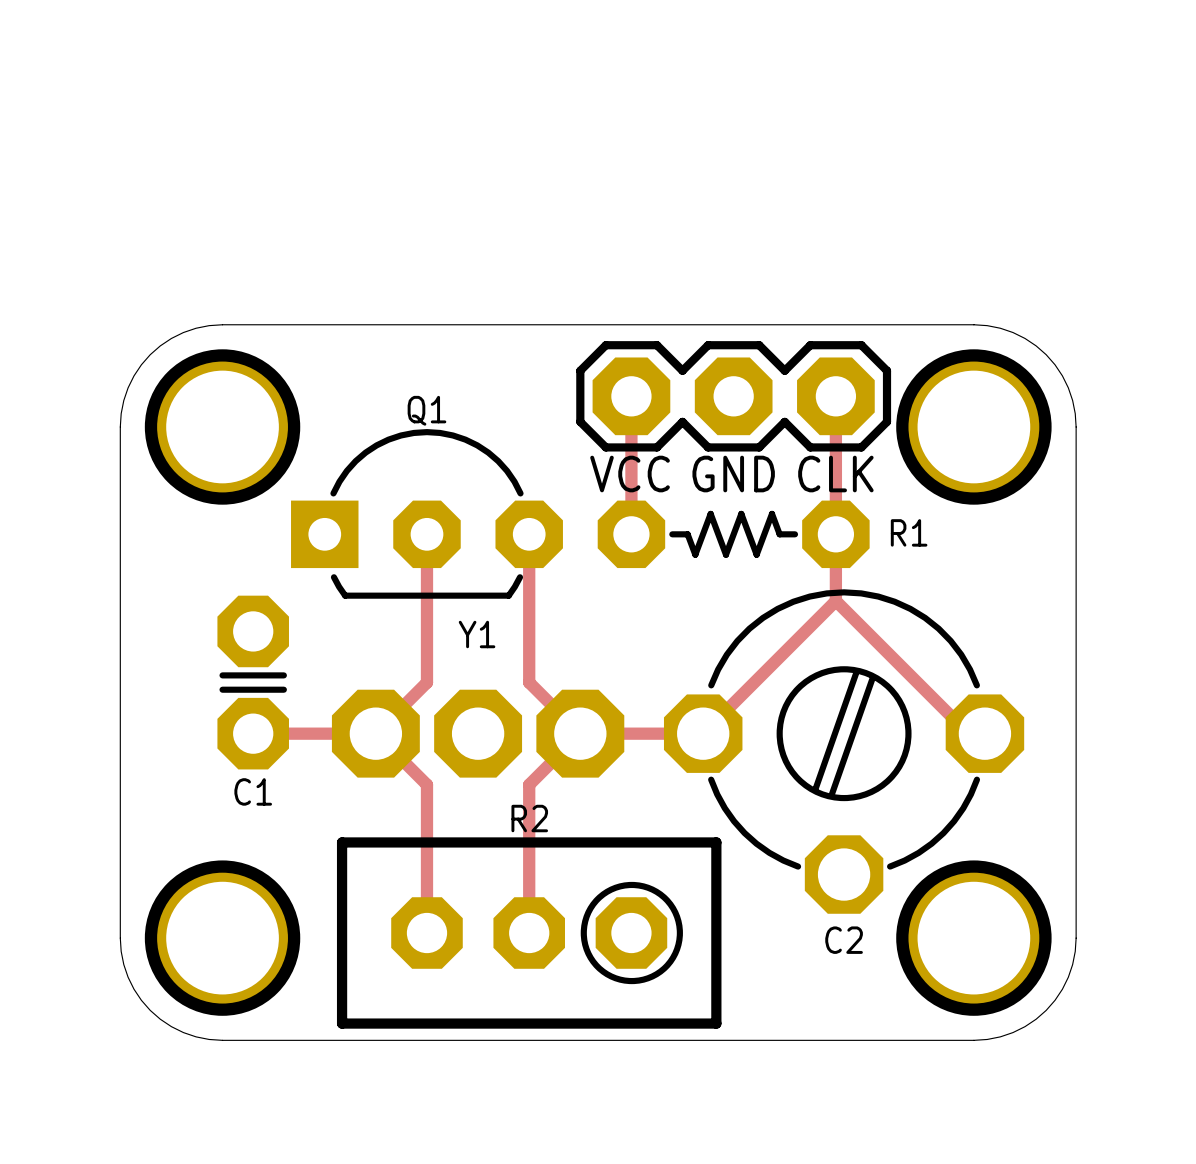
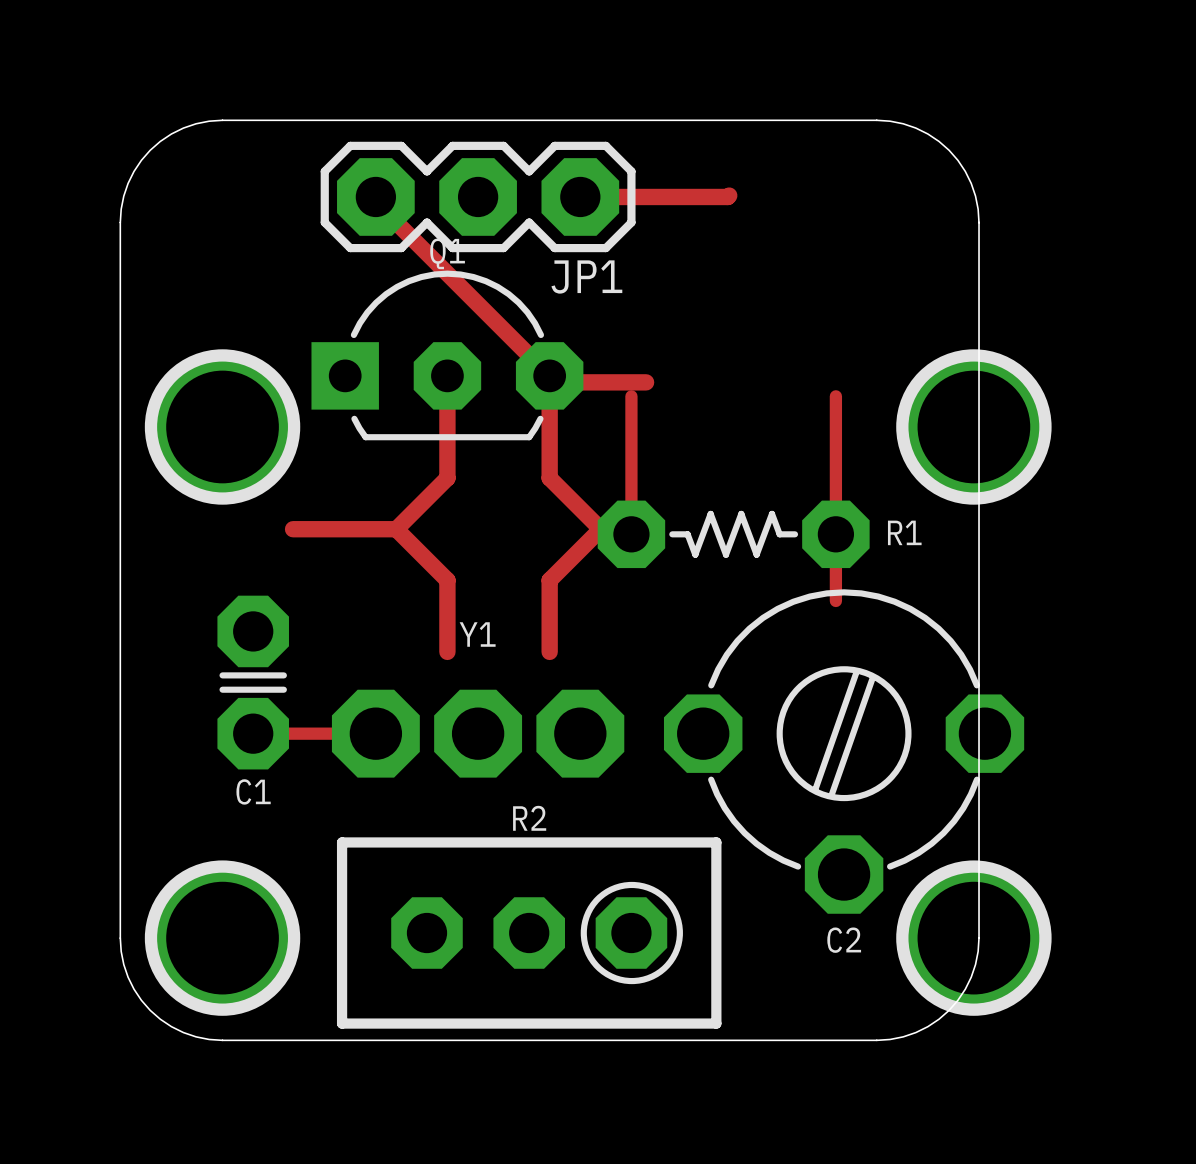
track: none -> (729, 195) (580, 196)
track: none -> (375, 196) (375, 202) (549, 375) (549, 478) (600, 529) (549, 580) (549, 651)
JP1: none -> (478, 196)
track: none -> (447, 375) (447, 478) (396, 529)
track: none -> (549, 382) (646, 382)
part: (733, 396) -> none
board edge: (120, 426) (123, 400) (128, 387) (141, 364) (150, 354) (160, 345) (183, 332) (209, 325) (973, 324) (1000, 328) (1013, 332) (1036, 345) (1055, 364) (1068, 387) (1072, 400) (1076, 426) (1076, 938) (1072, 964) (1062, 989) (1046, 1010) (1036, 1019) (1013, 1032) (1000, 1036) (973, 1040) (876, 1040) -> (120, 426) (120, 222) (123, 196) (134, 171) (150, 150) (160, 141) (183, 128) (196, 123) (222, 120) (876, 120) (903, 123) (915, 128) (939, 141) (957, 160) (971, 183) (975, 196) (979, 222) (978, 951) (971, 977) (957, 1000) (949, 1010) (939, 1019) (915, 1032) (903, 1036) (876, 1040)
text: VCC (630, 474) -> none
text: GND (733, 474) -> none
text: CLK (835, 474) -> none
Q1 position: (426, 513) -> (447, 355)
track: none -> (293, 529) (396, 529)
track: none -> (396, 529) (447, 580) (447, 651)
track: (426, 534) (426, 682) (375, 733) (426, 784) (426, 933) -> none
track: (529, 534) (529, 682) (580, 733) -> none
track: (580, 733) (703, 733) (835, 600) (968, 733) (984, 733) -> none
track: (580, 733) (529, 784) (529, 933) -> none

